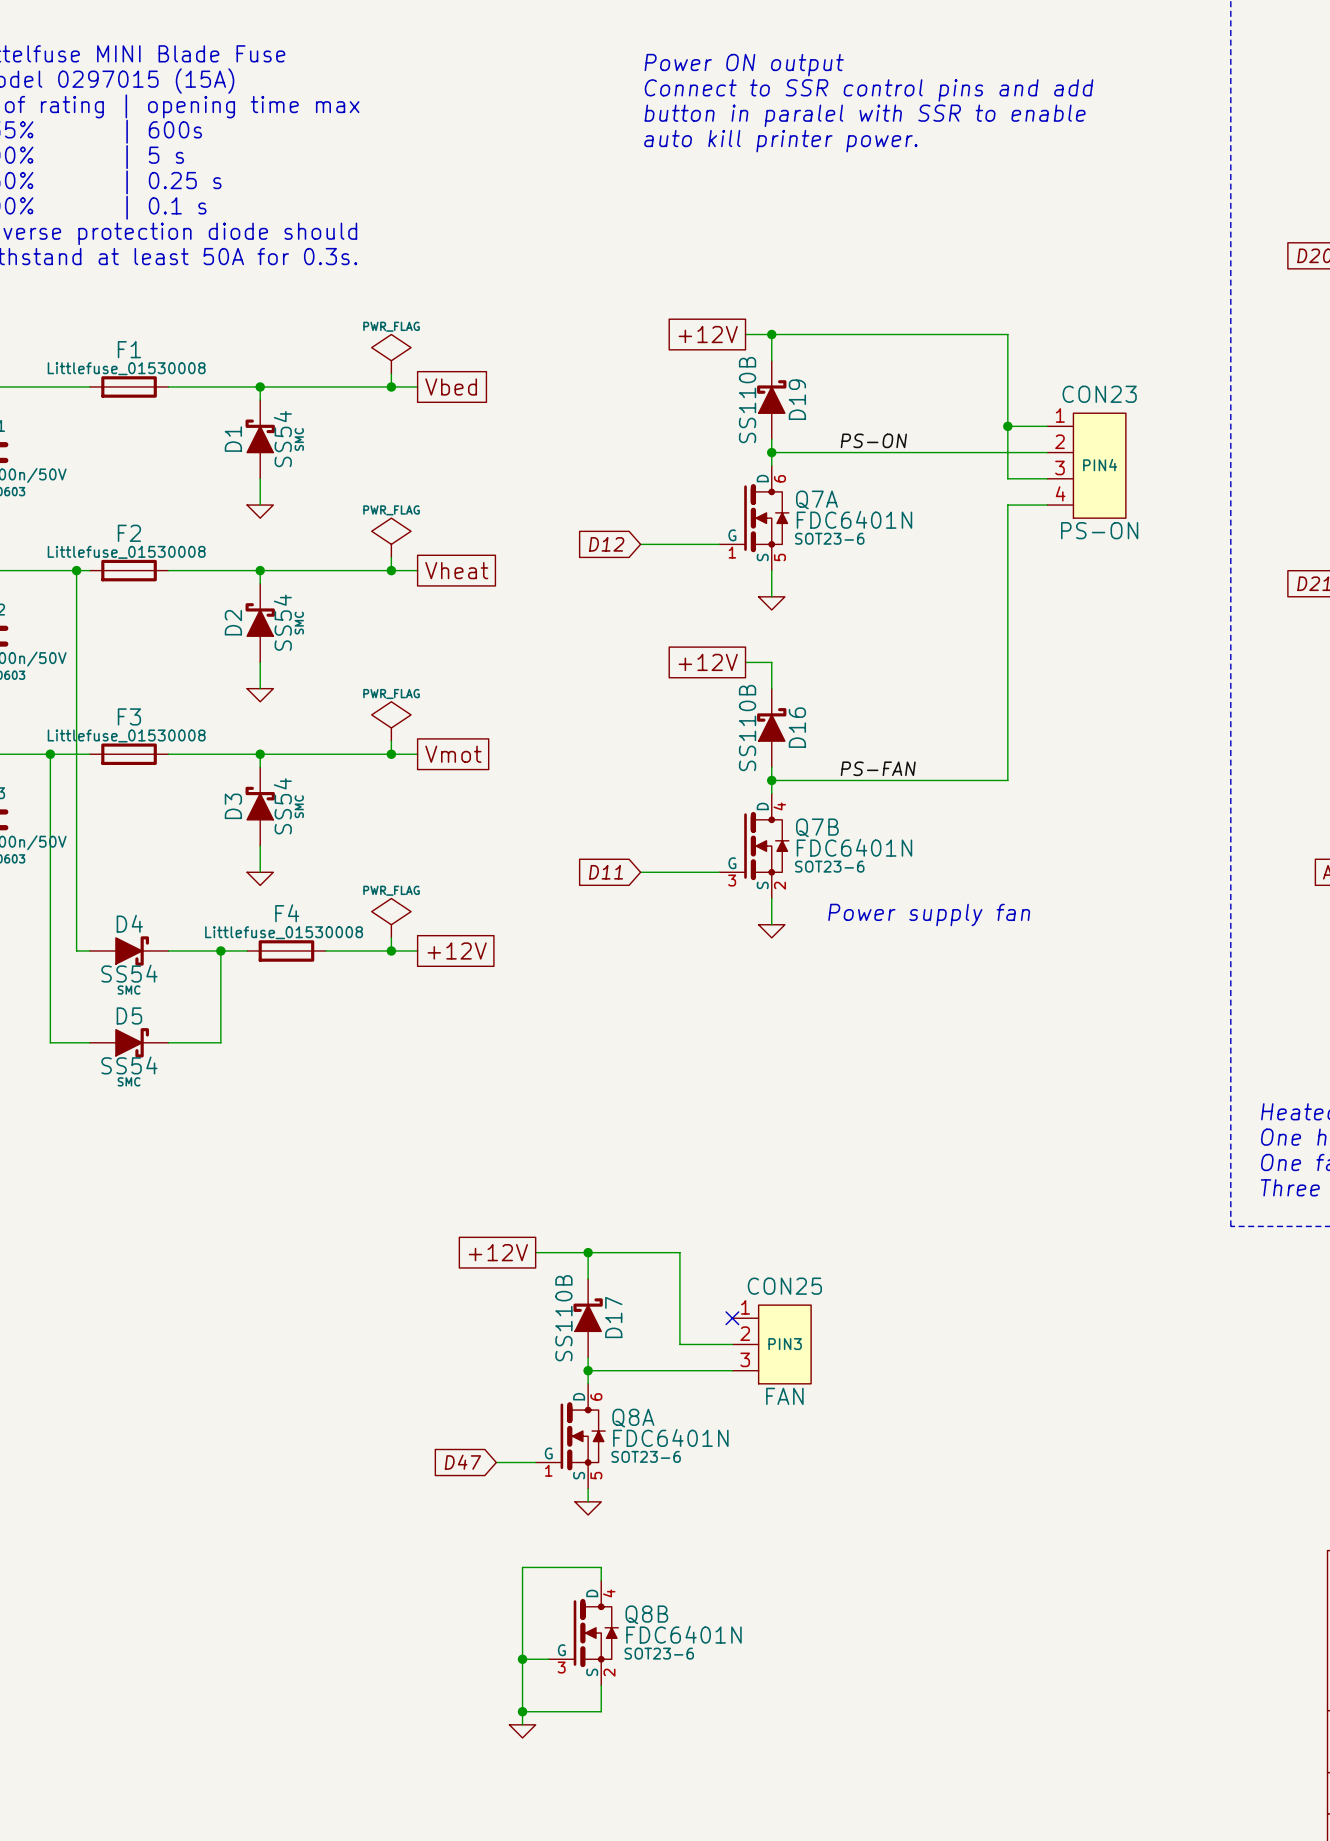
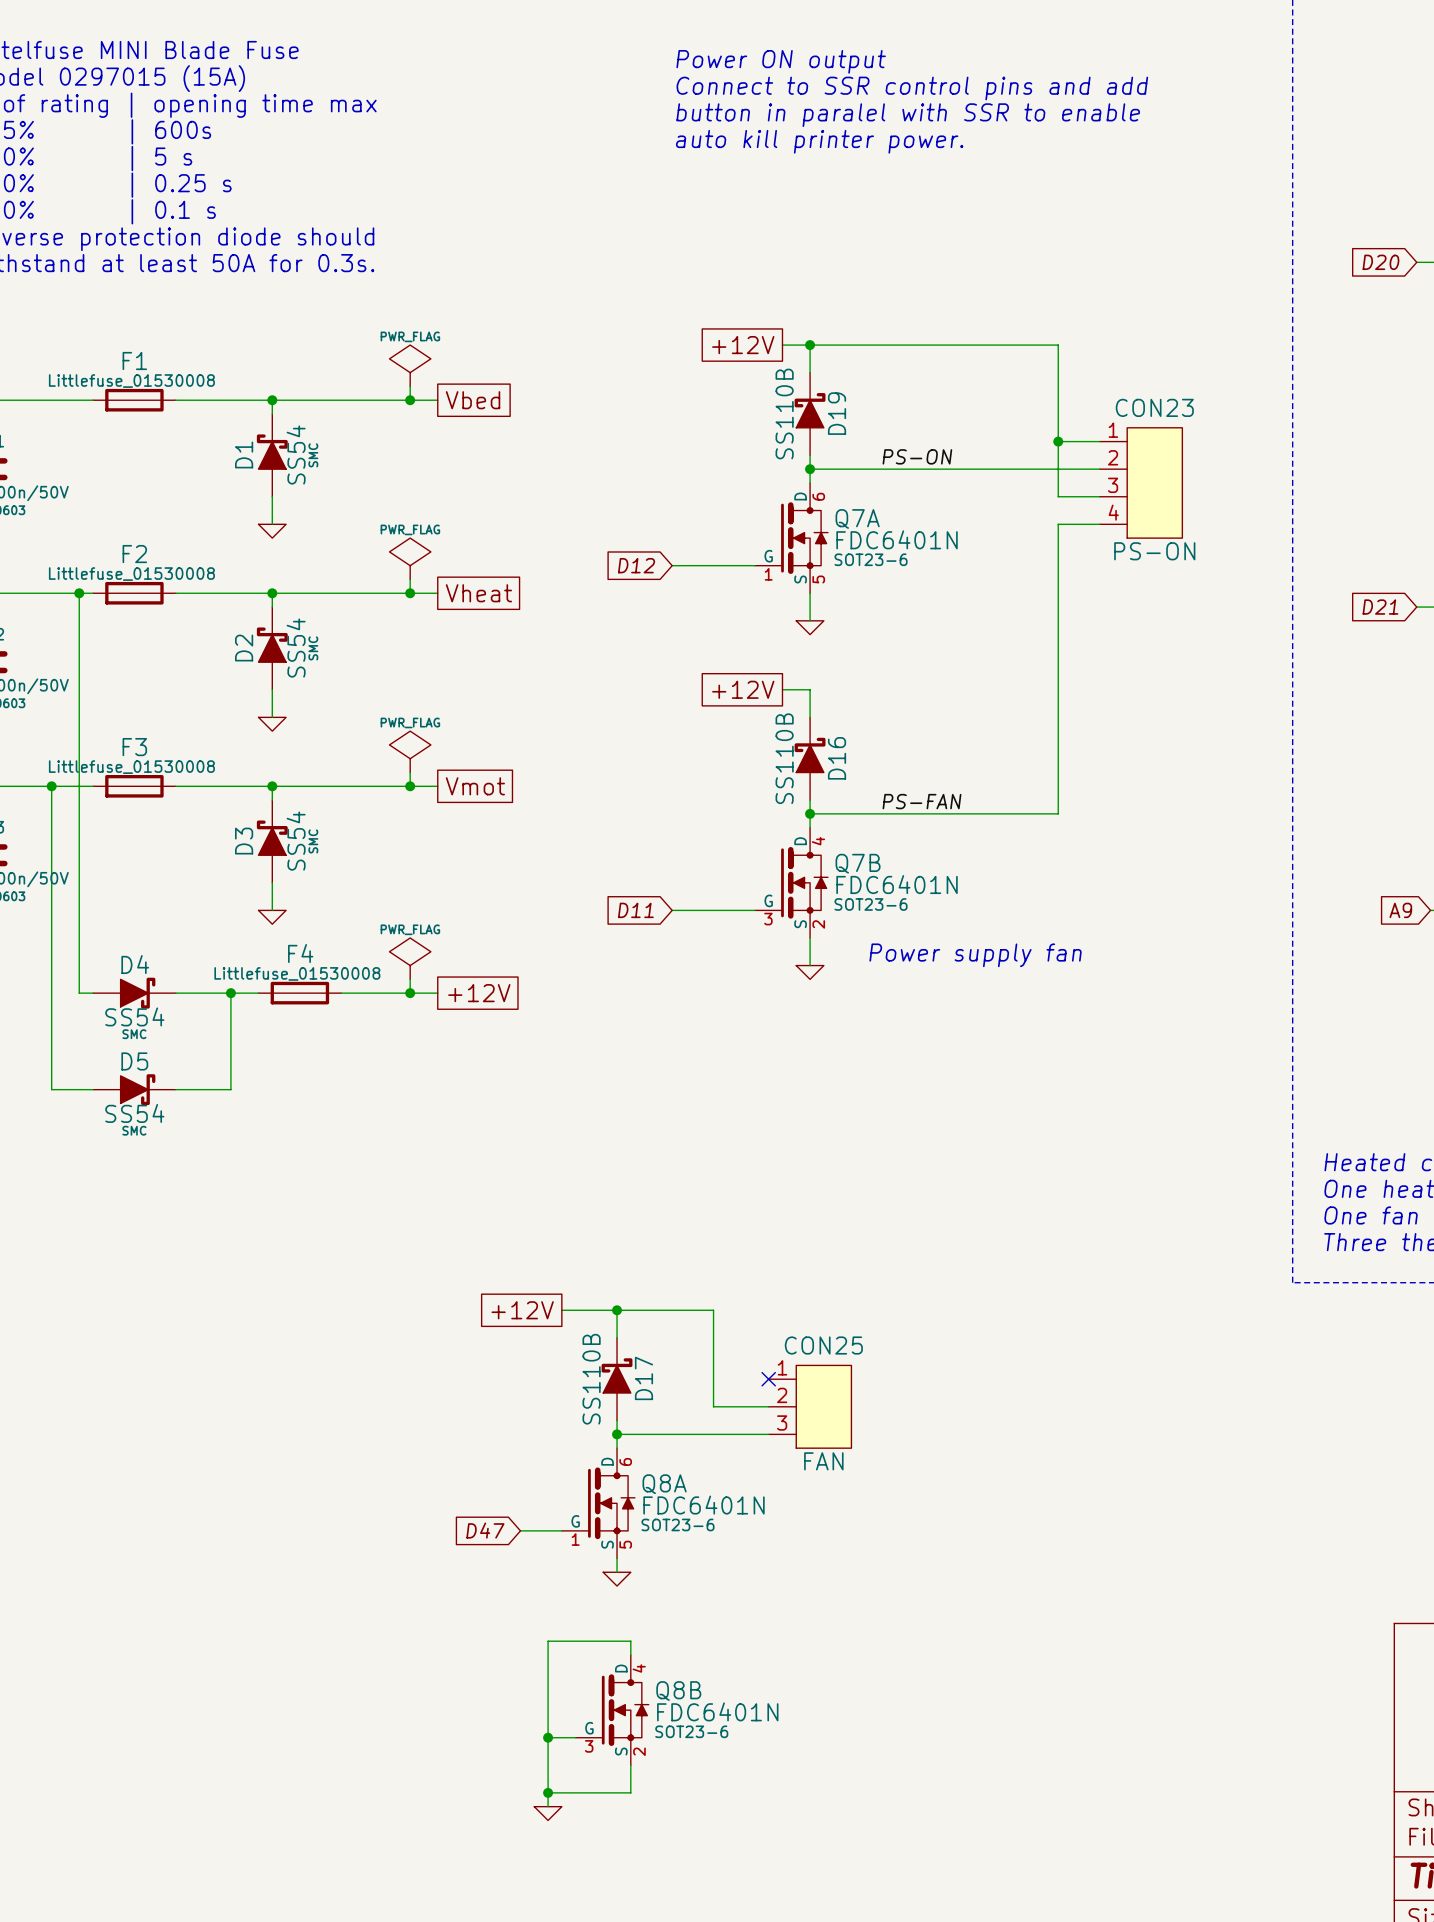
CON23 text: PIN4 (1100, 465) -> none
CON25 text: PIN3 (785, 1344) -> none

